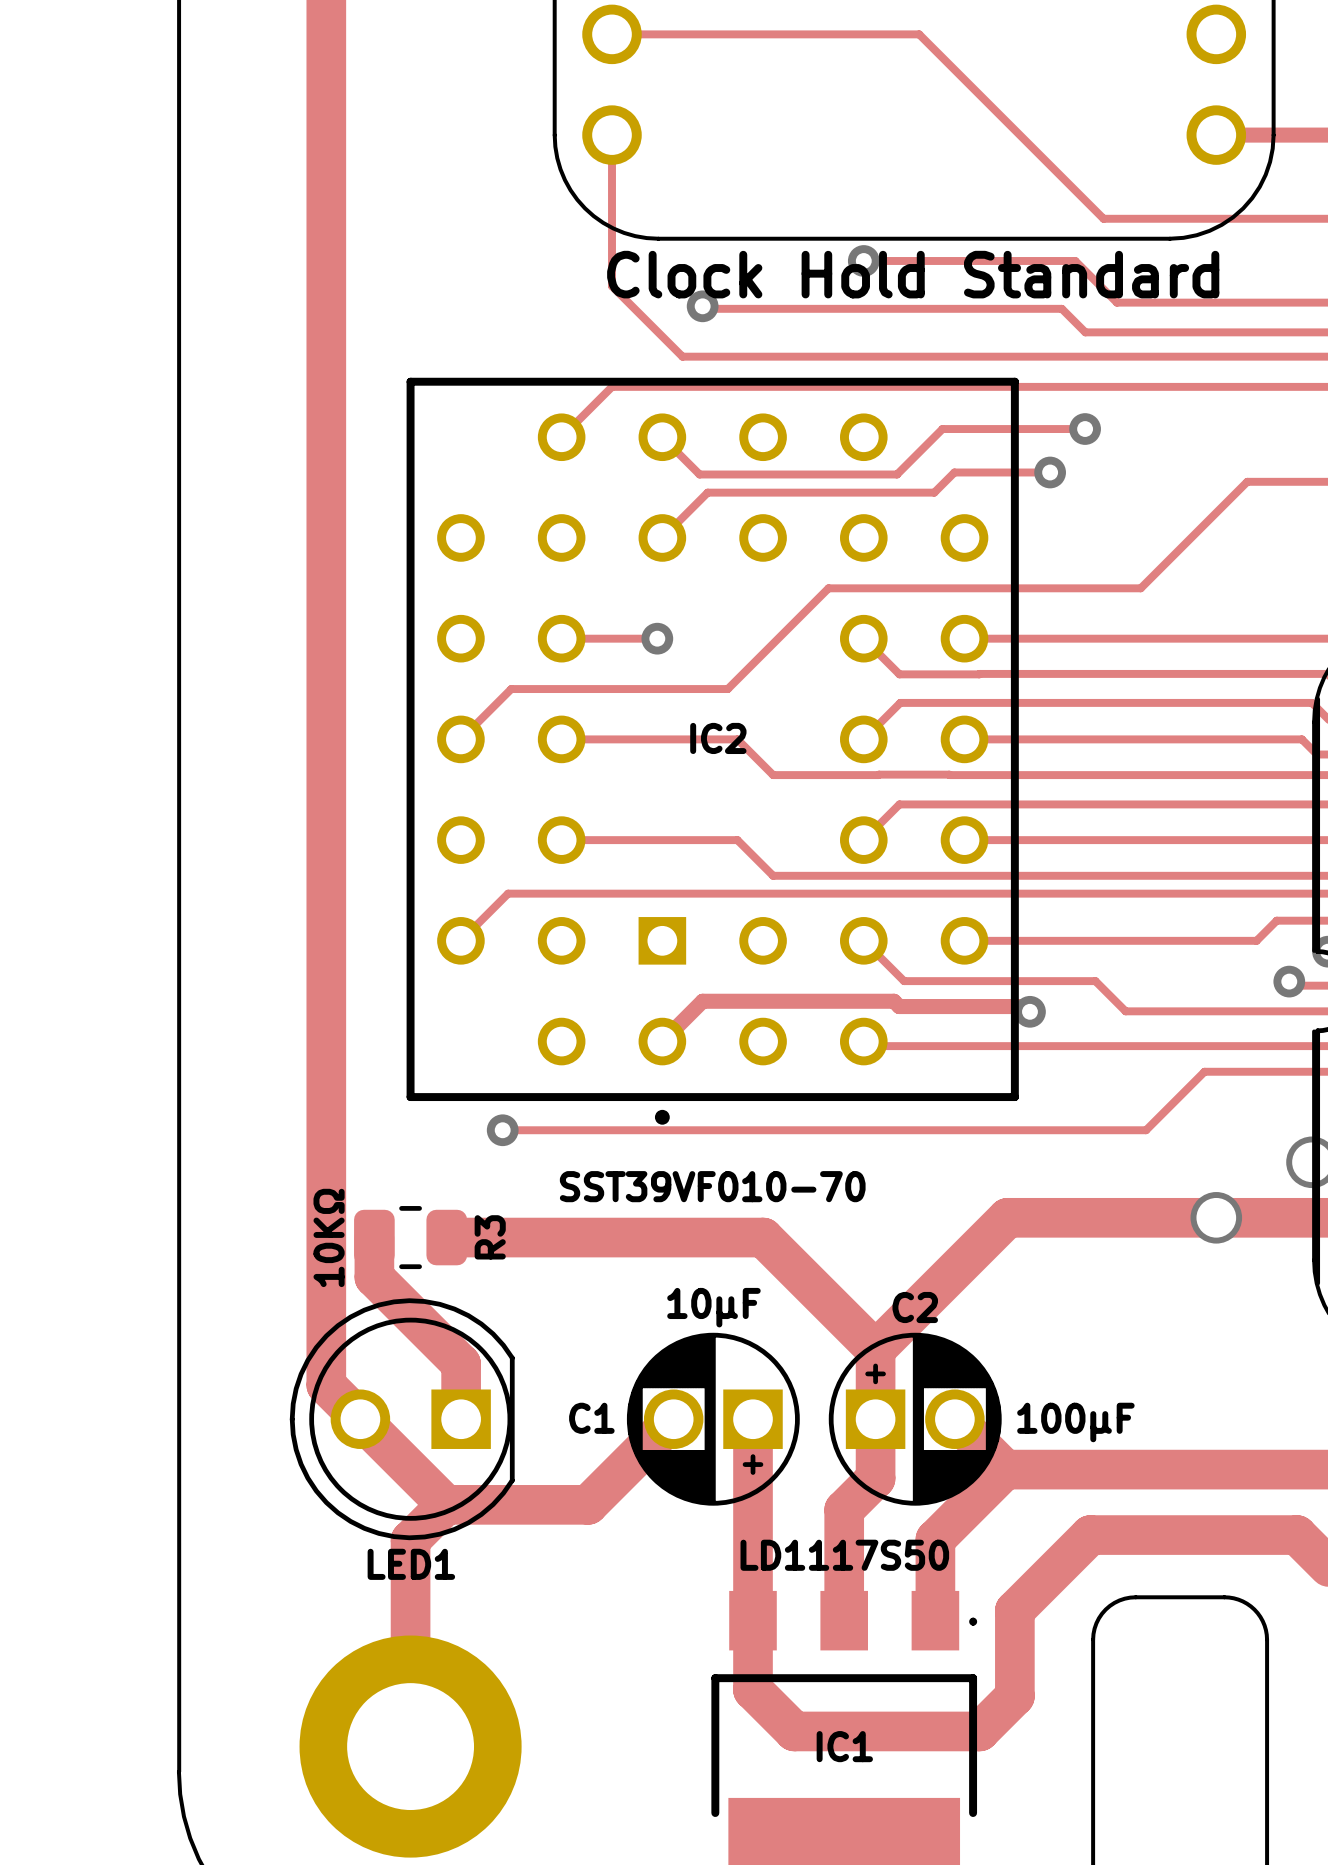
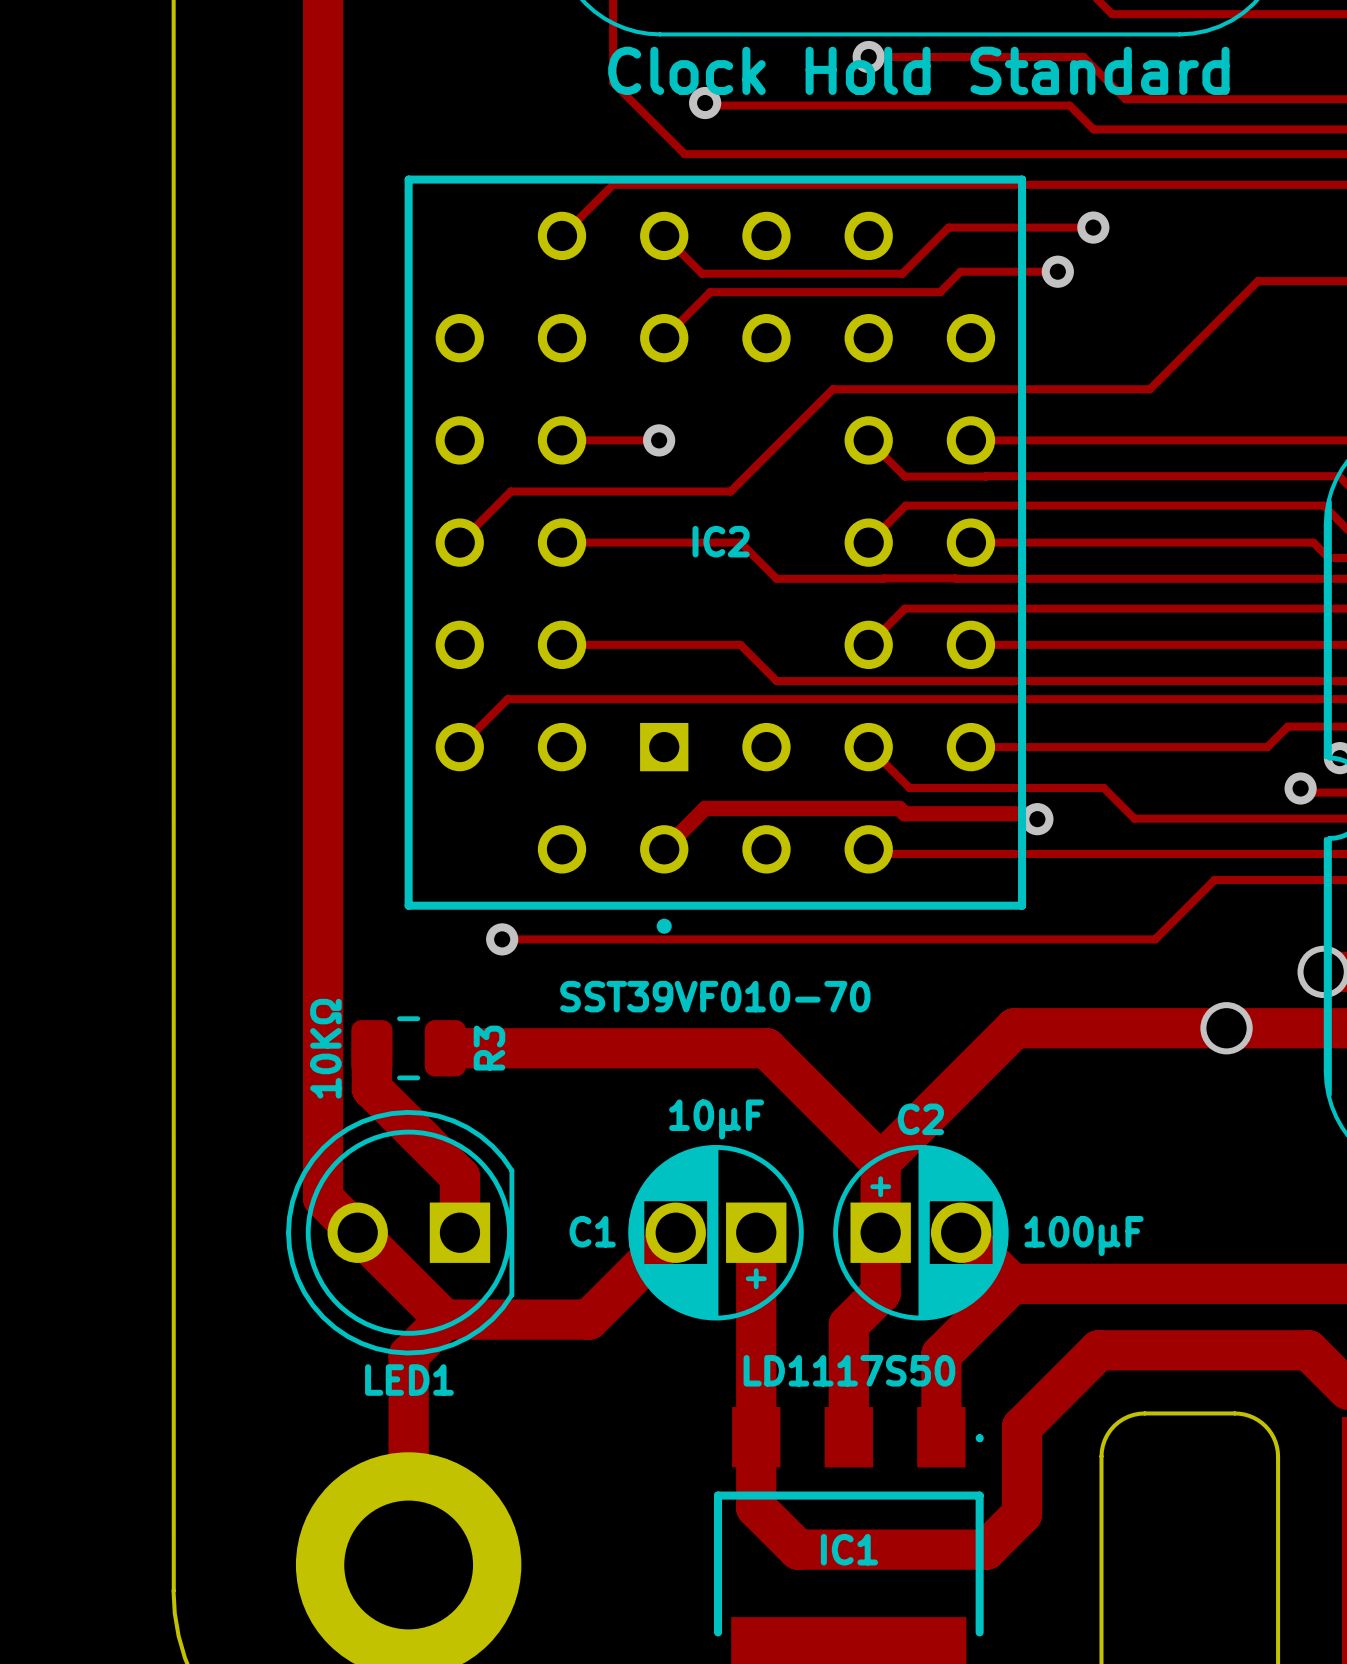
IC1 name position: IC1 (844, 1746) -> IC1 (849, 1549)

